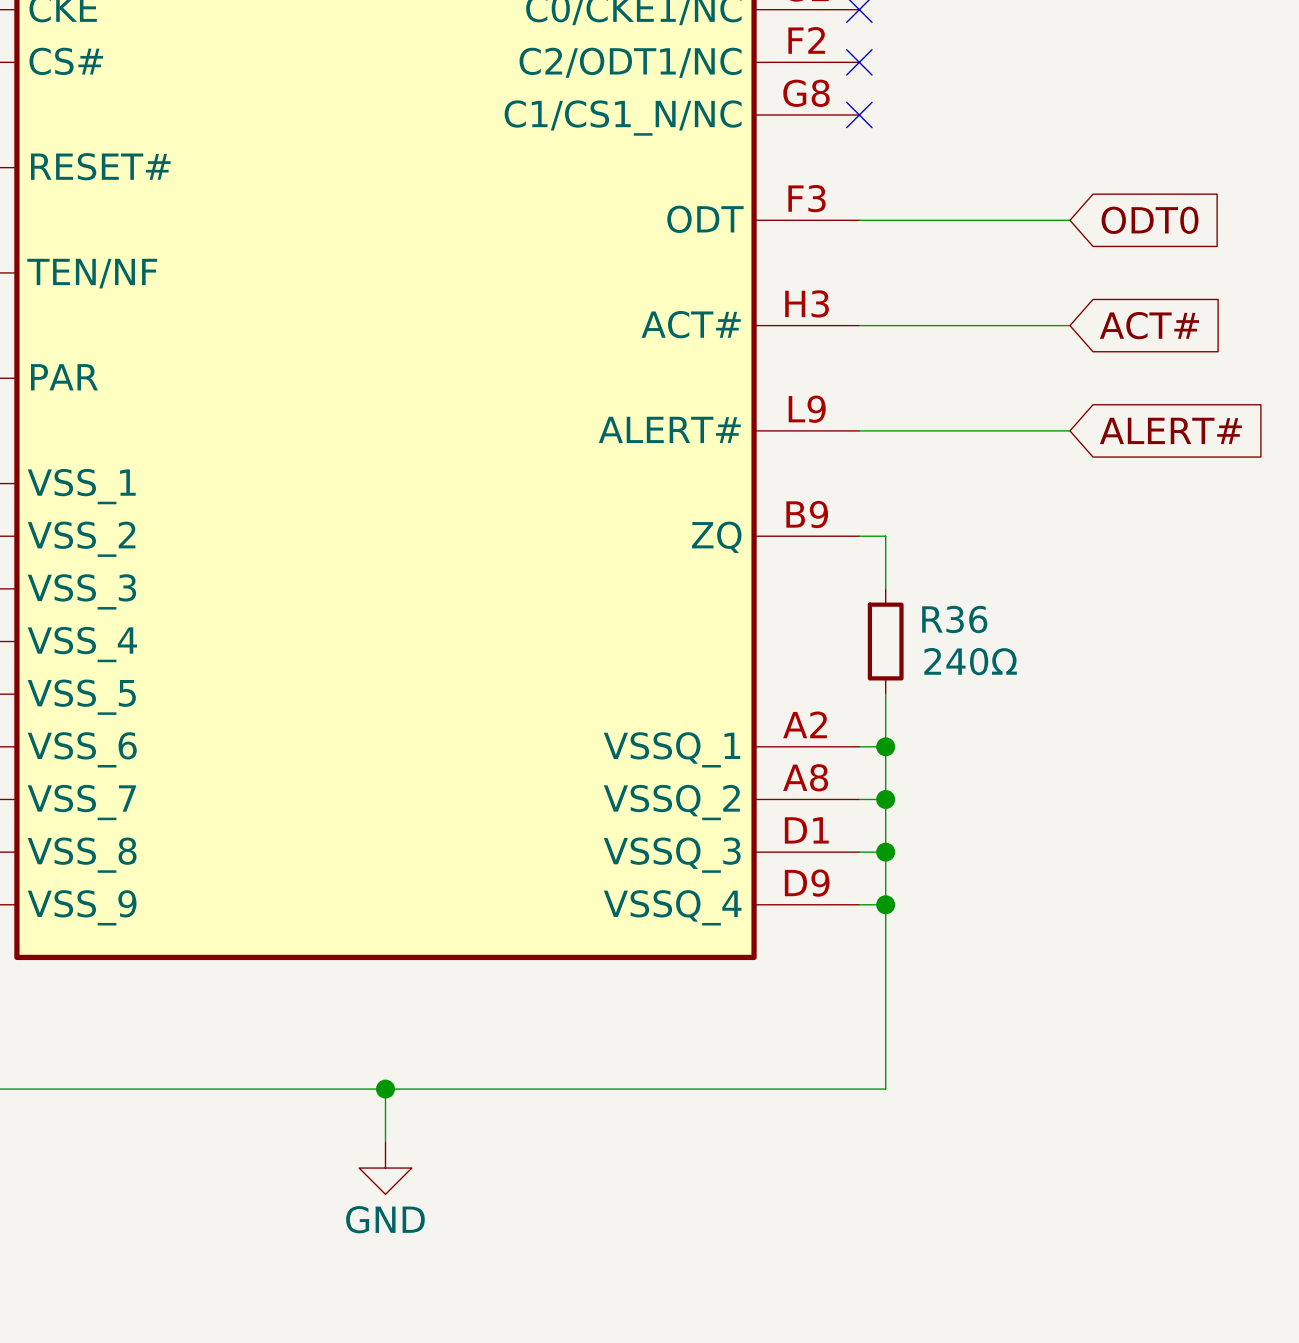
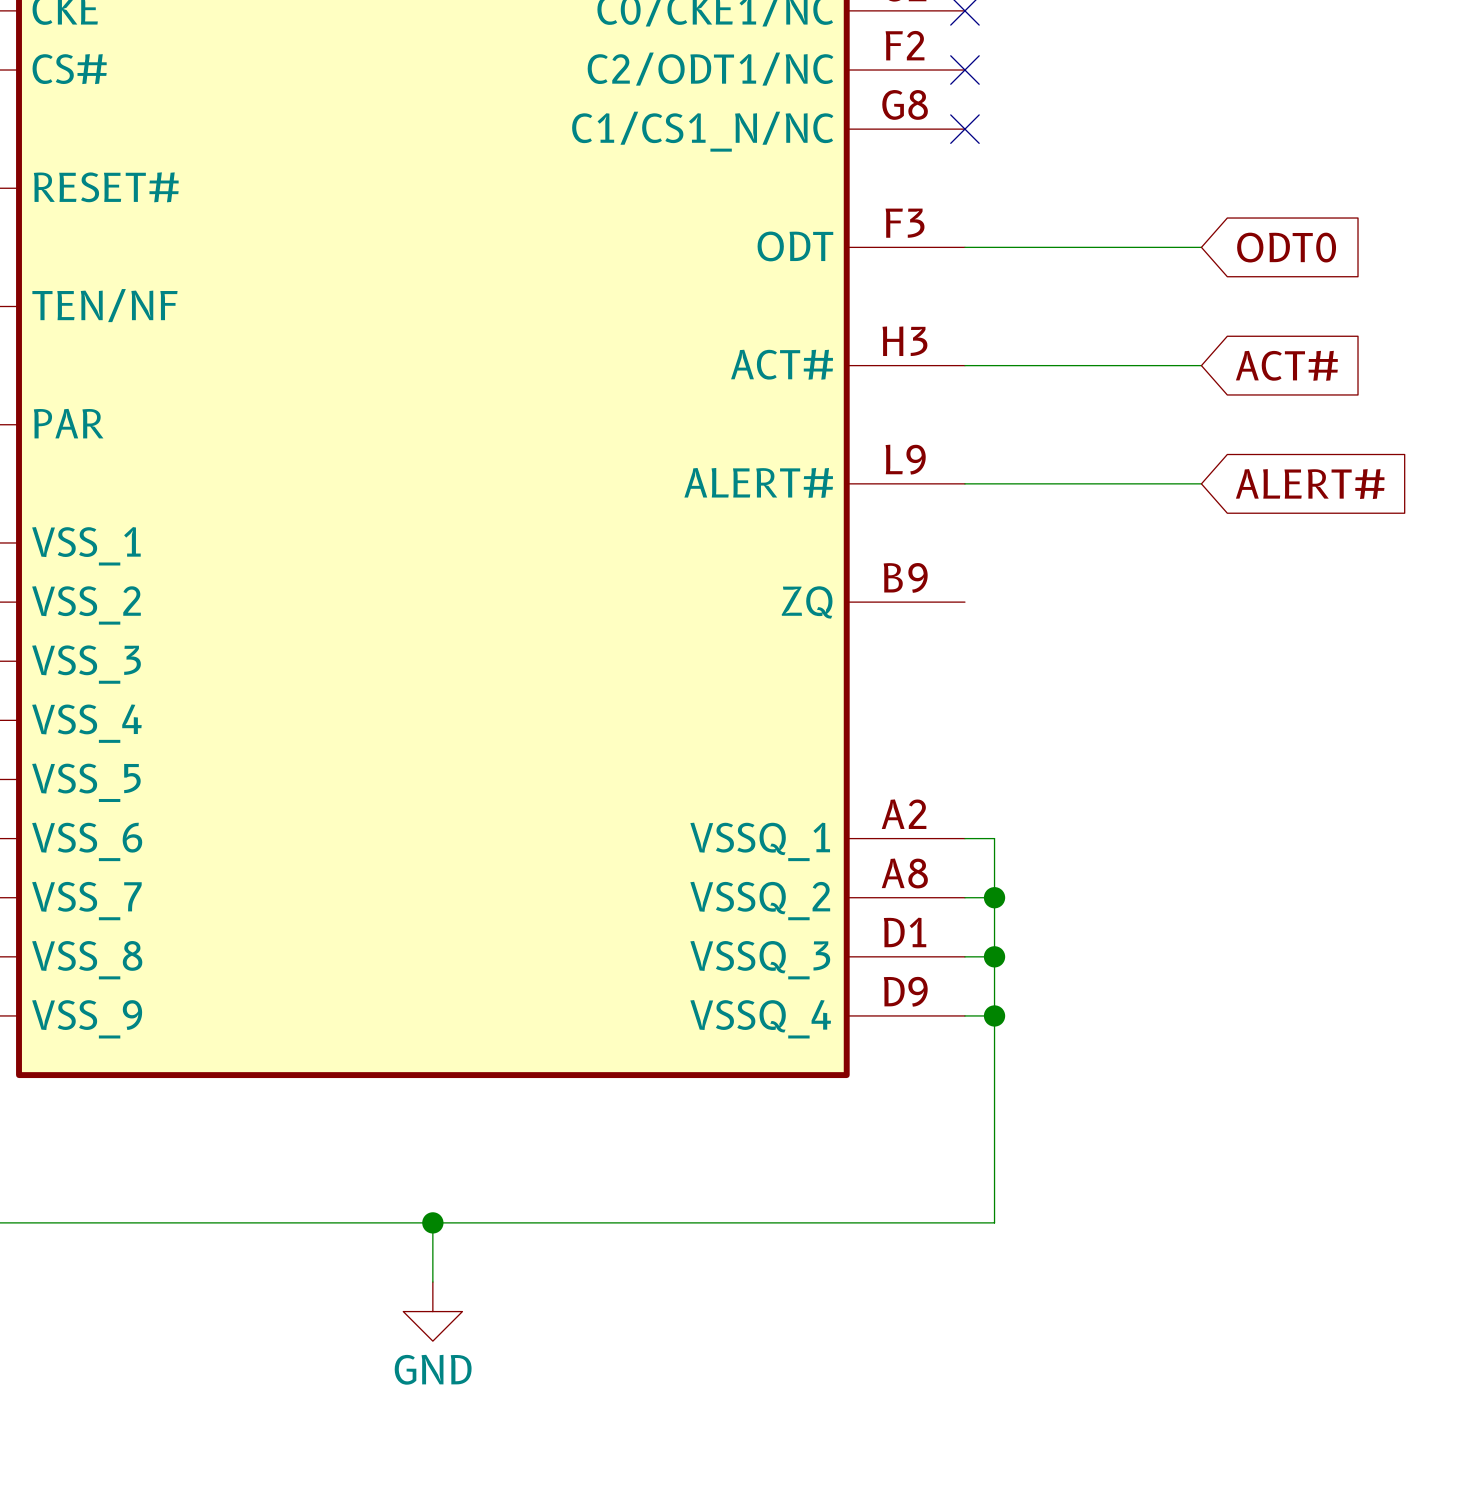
wire: (859, 536) (885, 536) (885, 588) -> none
R36: 240Ω (885, 641) -> none
wire: (885, 694) (885, 746) -> none
junction: (885, 746) -> none

